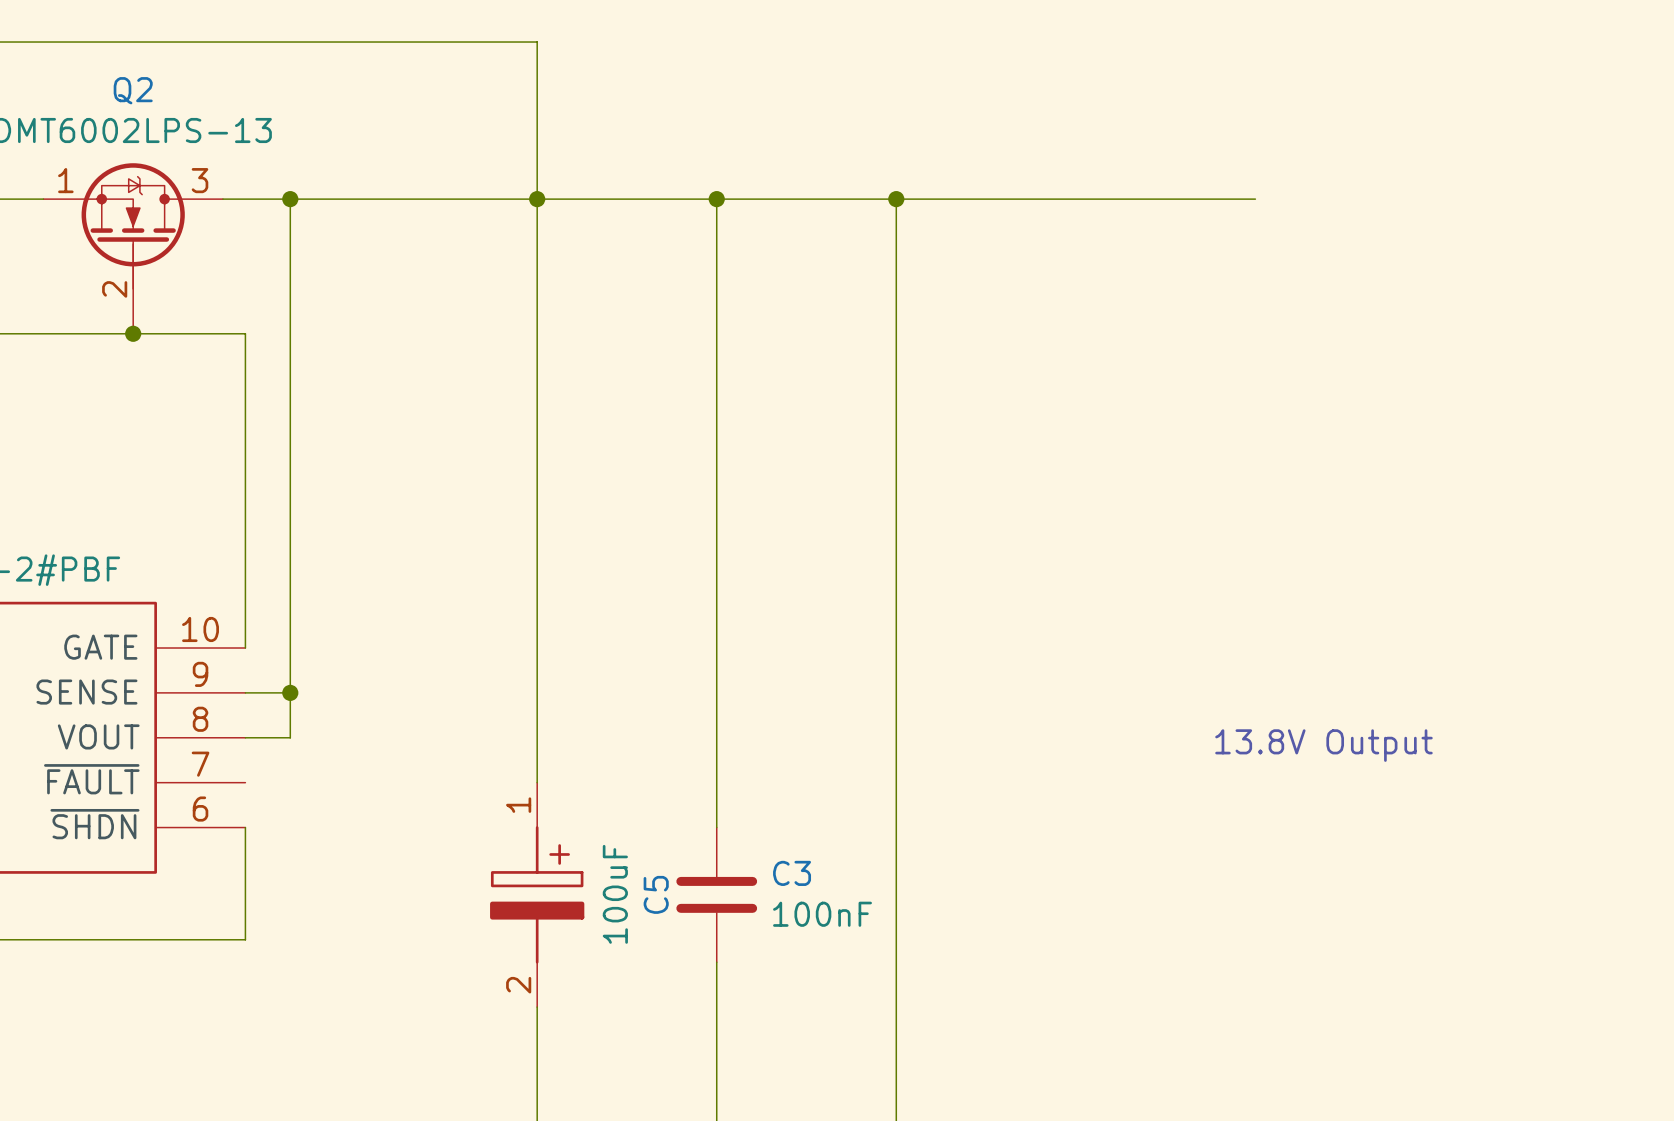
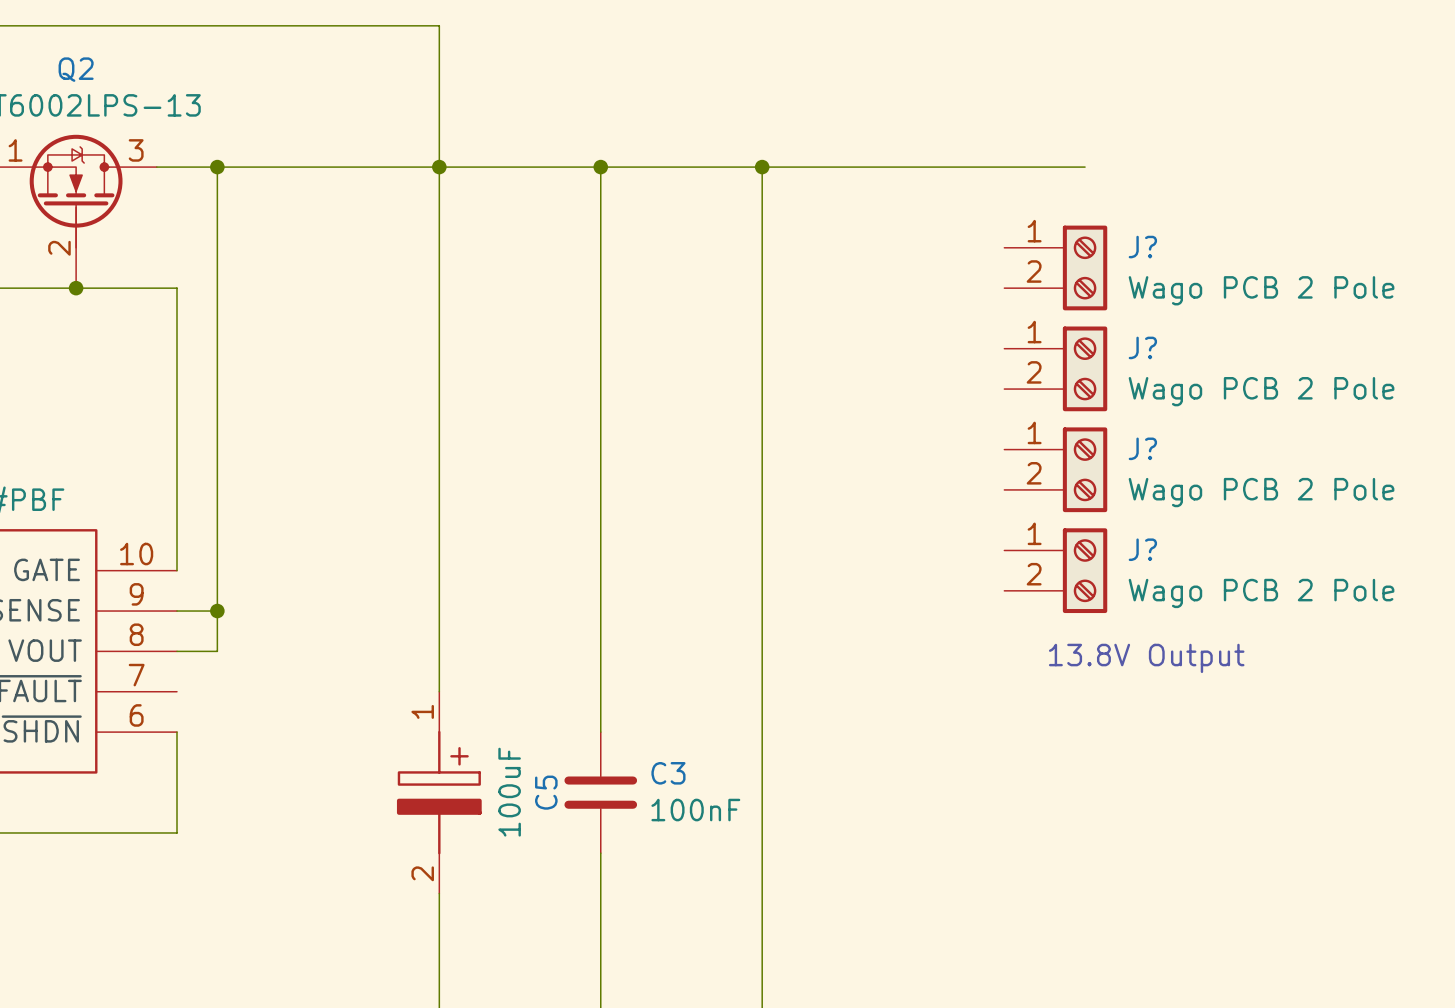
J?: none -> Wago PCB 2 Pole (1055, 267)
J?: none -> Wago PCB 2 Pole (1055, 368)
J?: none -> Wago PCB 2 Pole (1055, 469)
J?: none -> Wago PCB 2 Pole (1055, 570)

